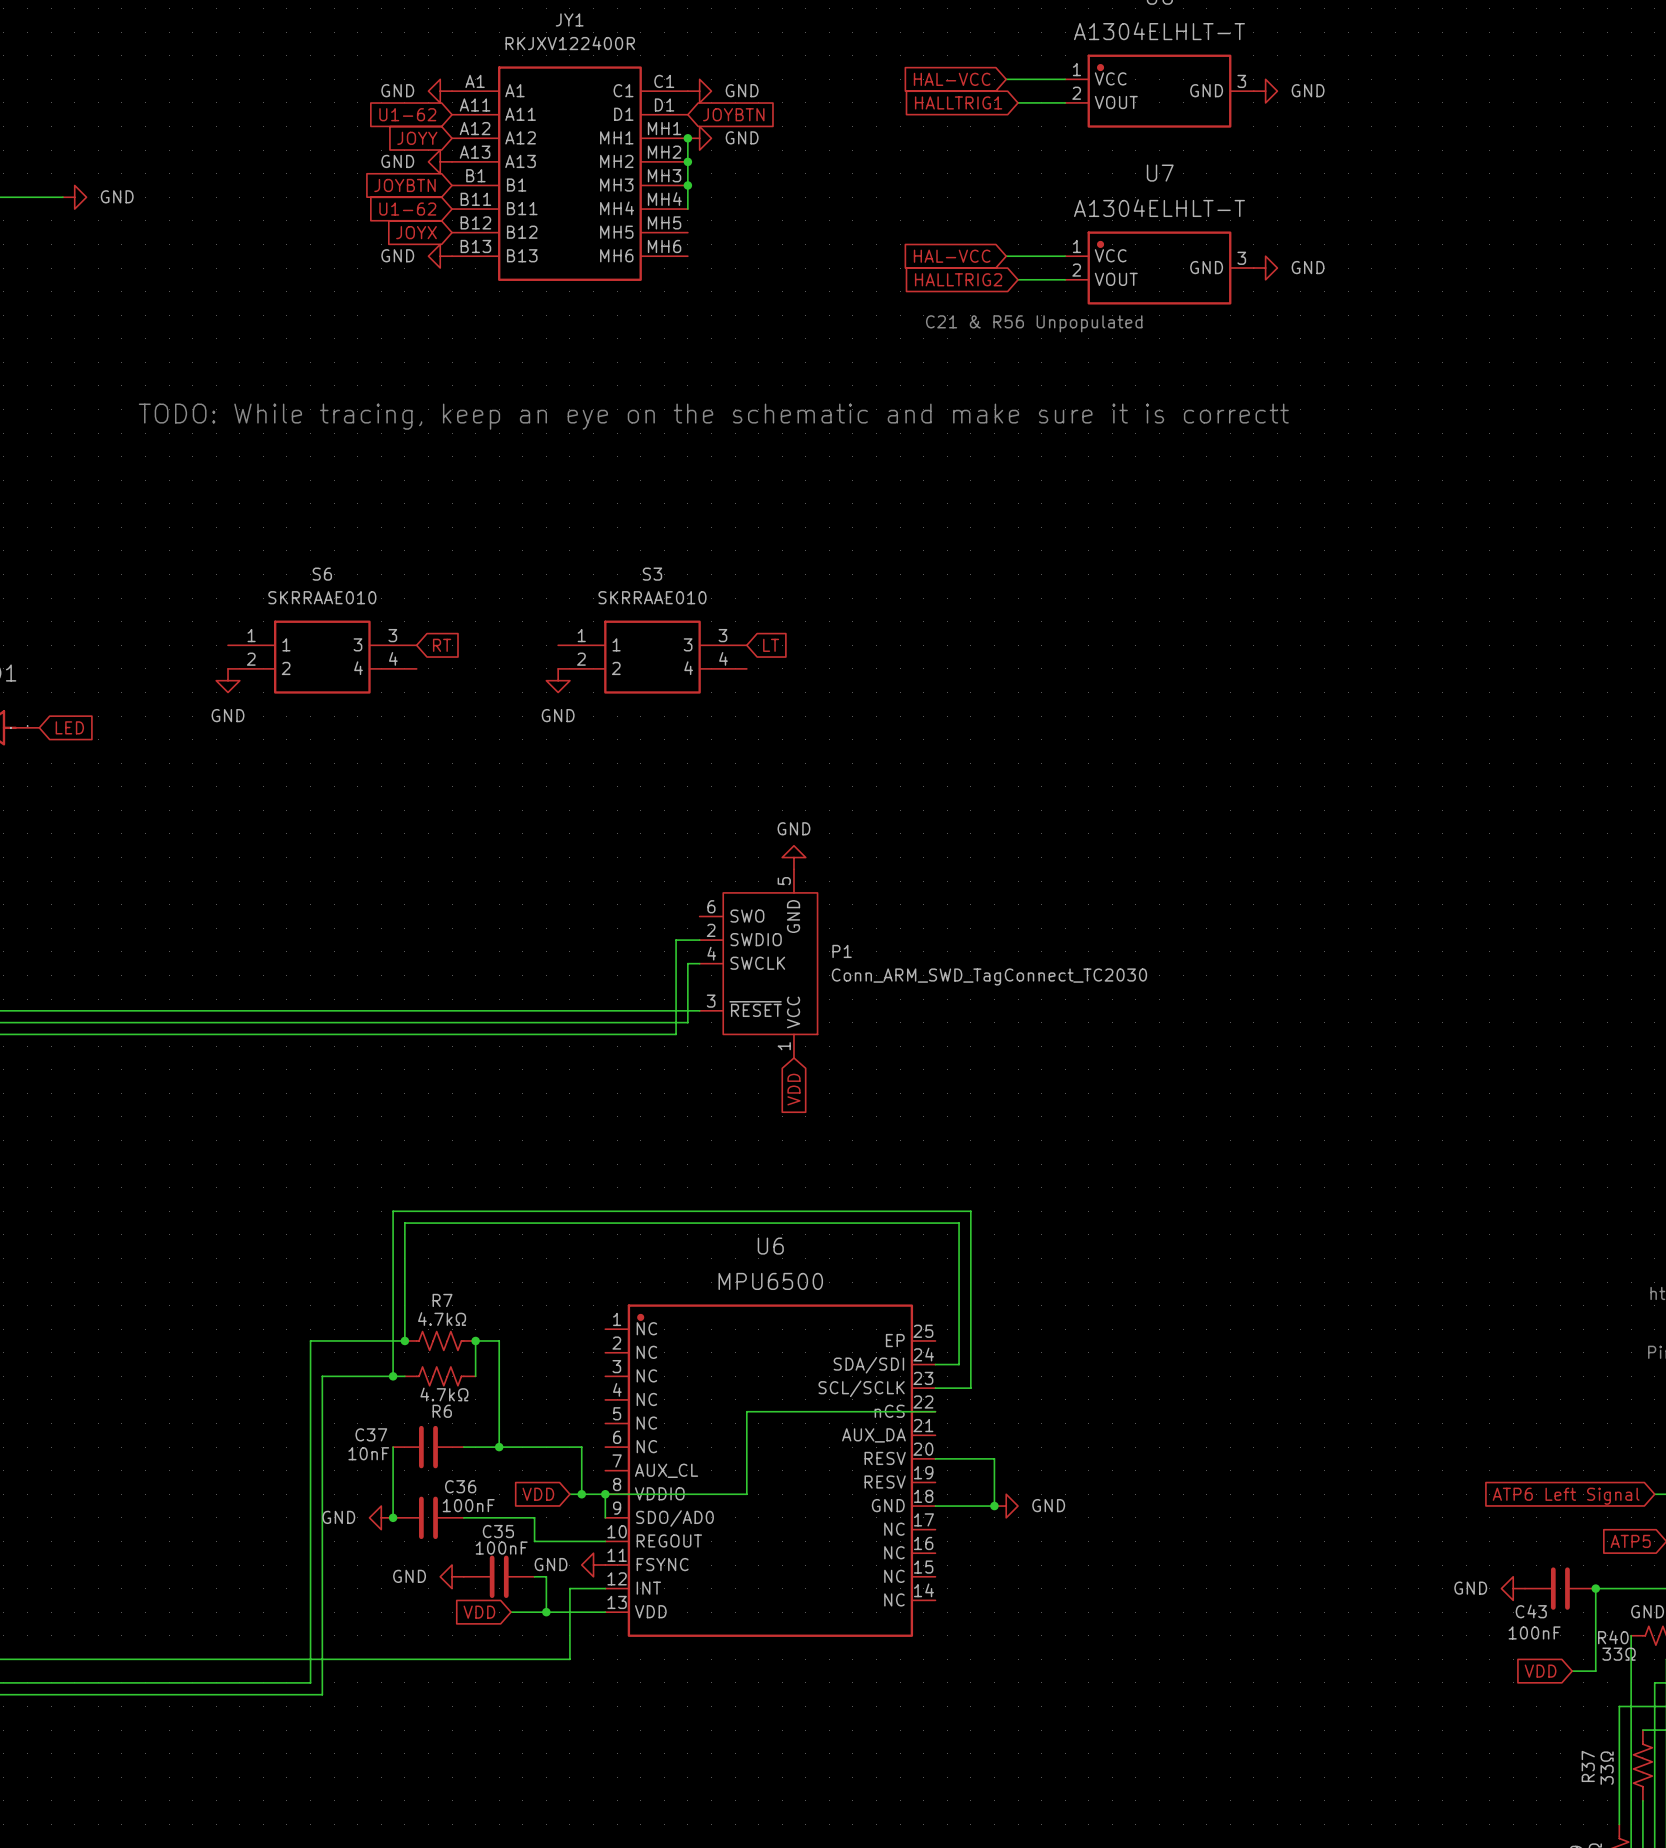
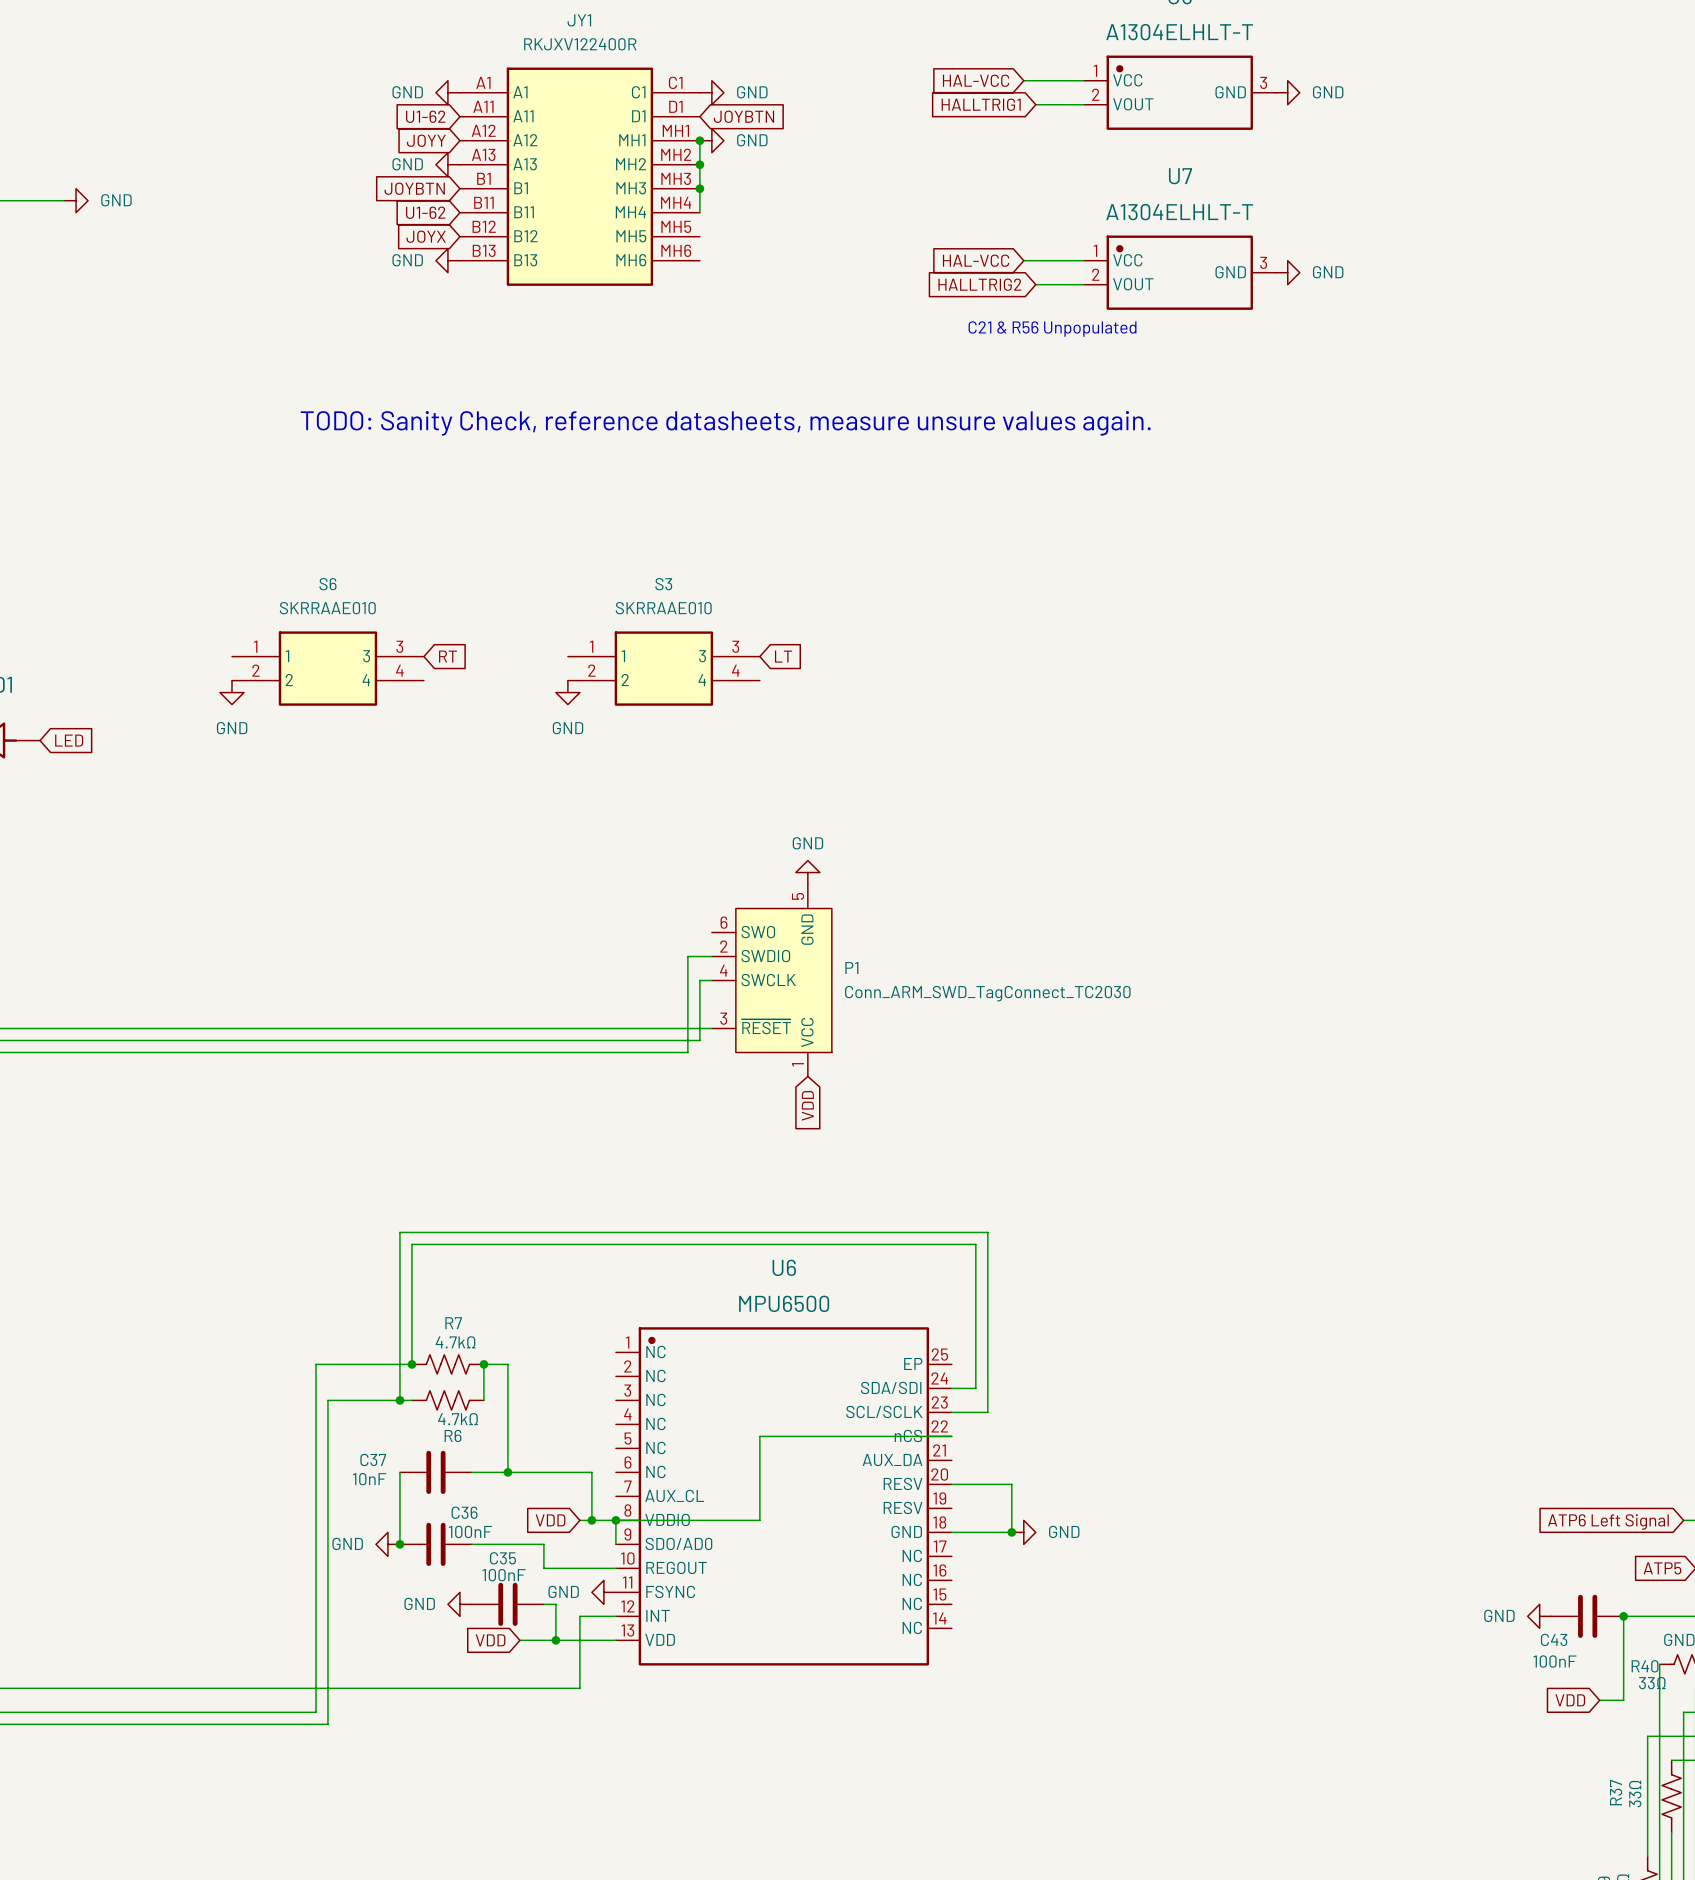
text: TODO: While tracing, keep an eye on the schematic and make sure it is correctt (713, 416) -> TODO: Sanity Check, reference datasheets, measure unsure values again. (725, 423)

